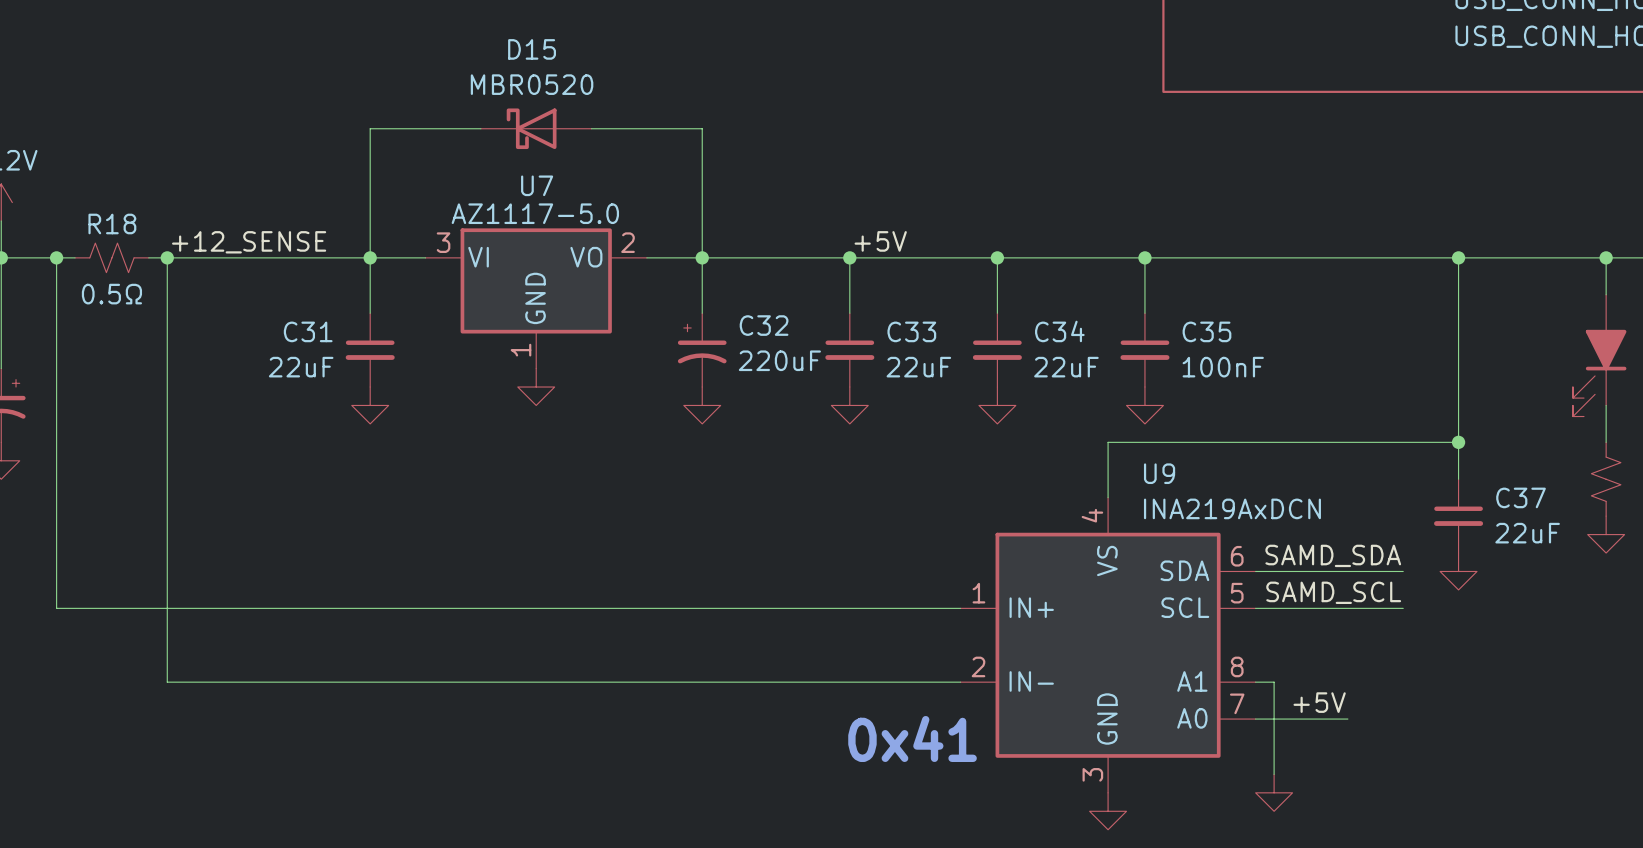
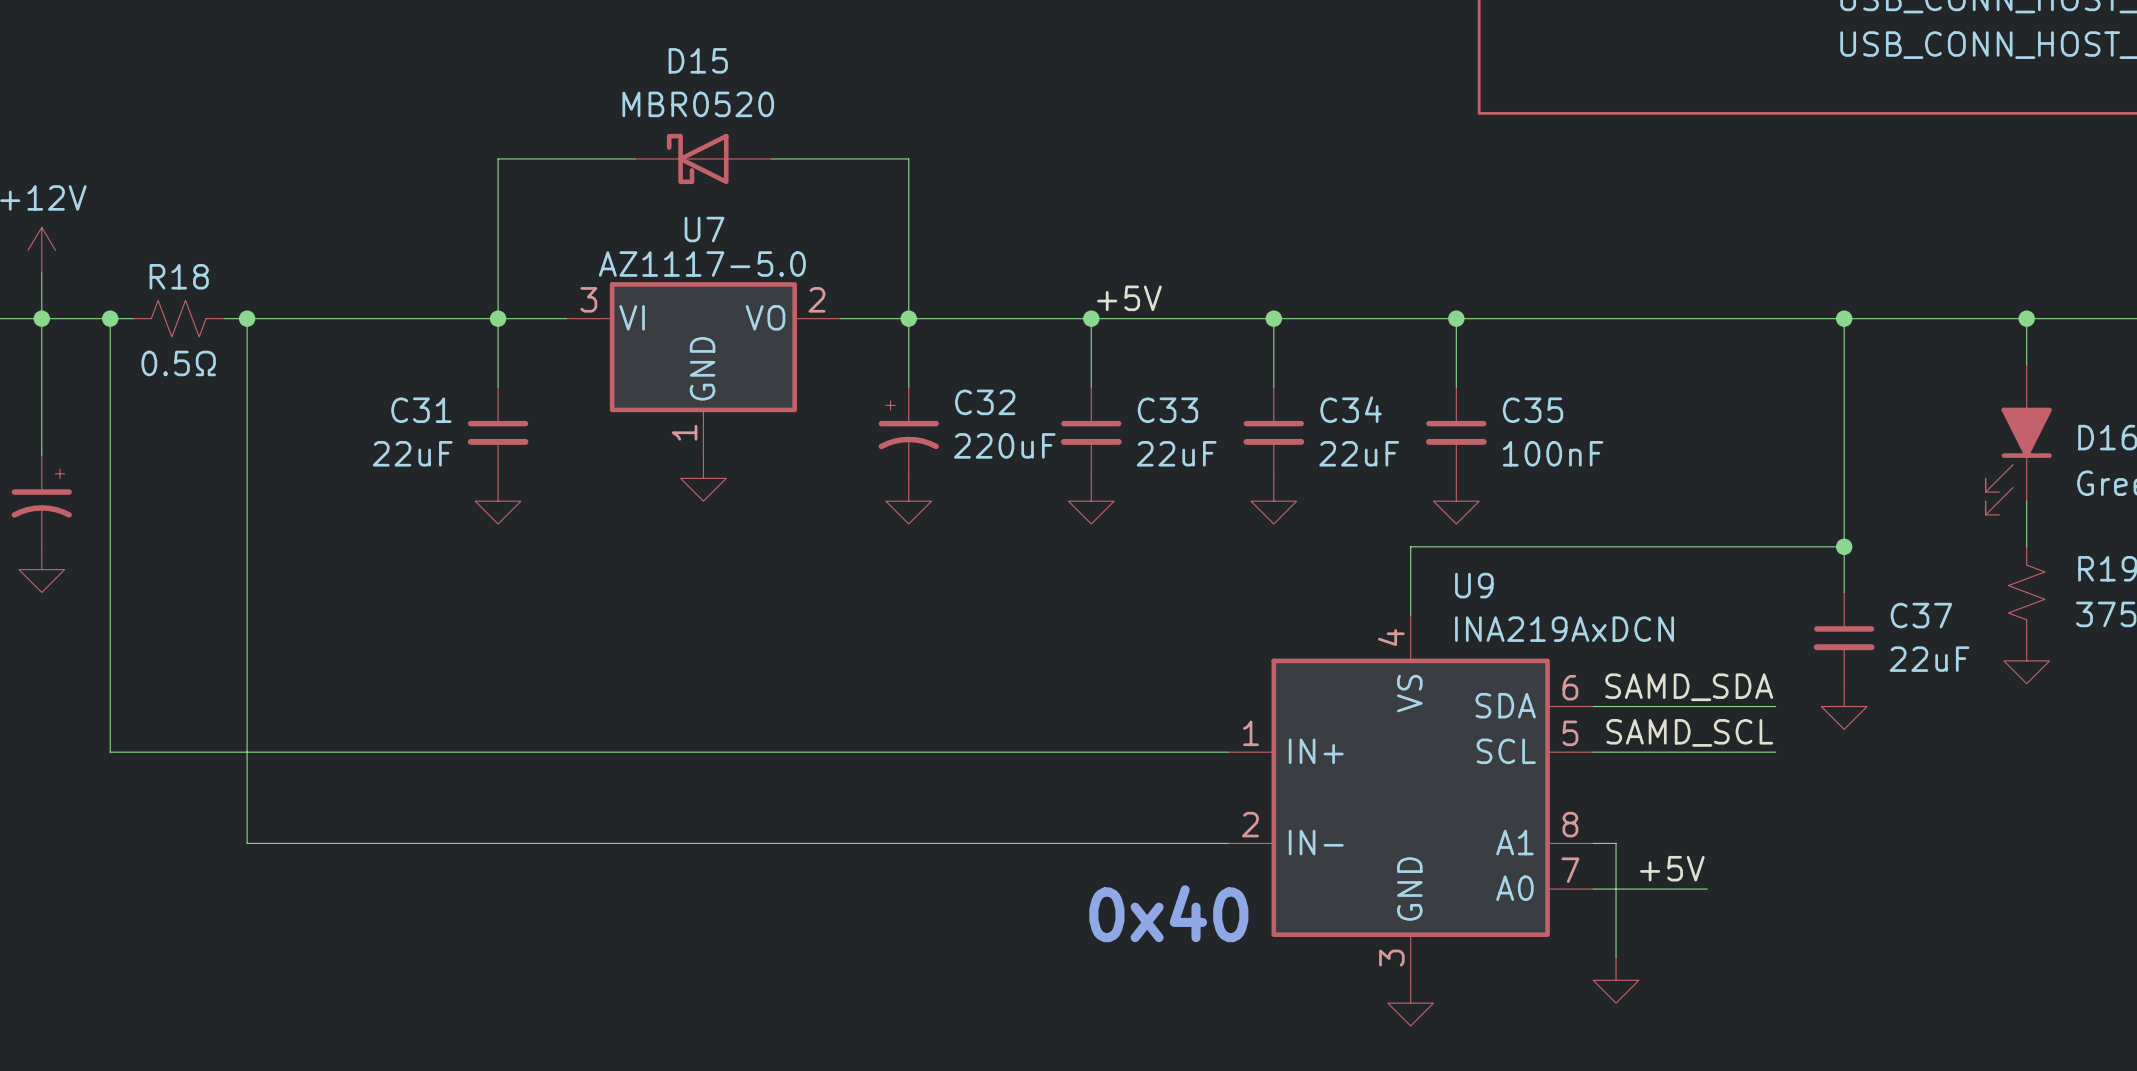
label: +12_SENSE (249, 242) -> none
text: 0x41 (912, 738) -> 0x40 (1168, 913)

